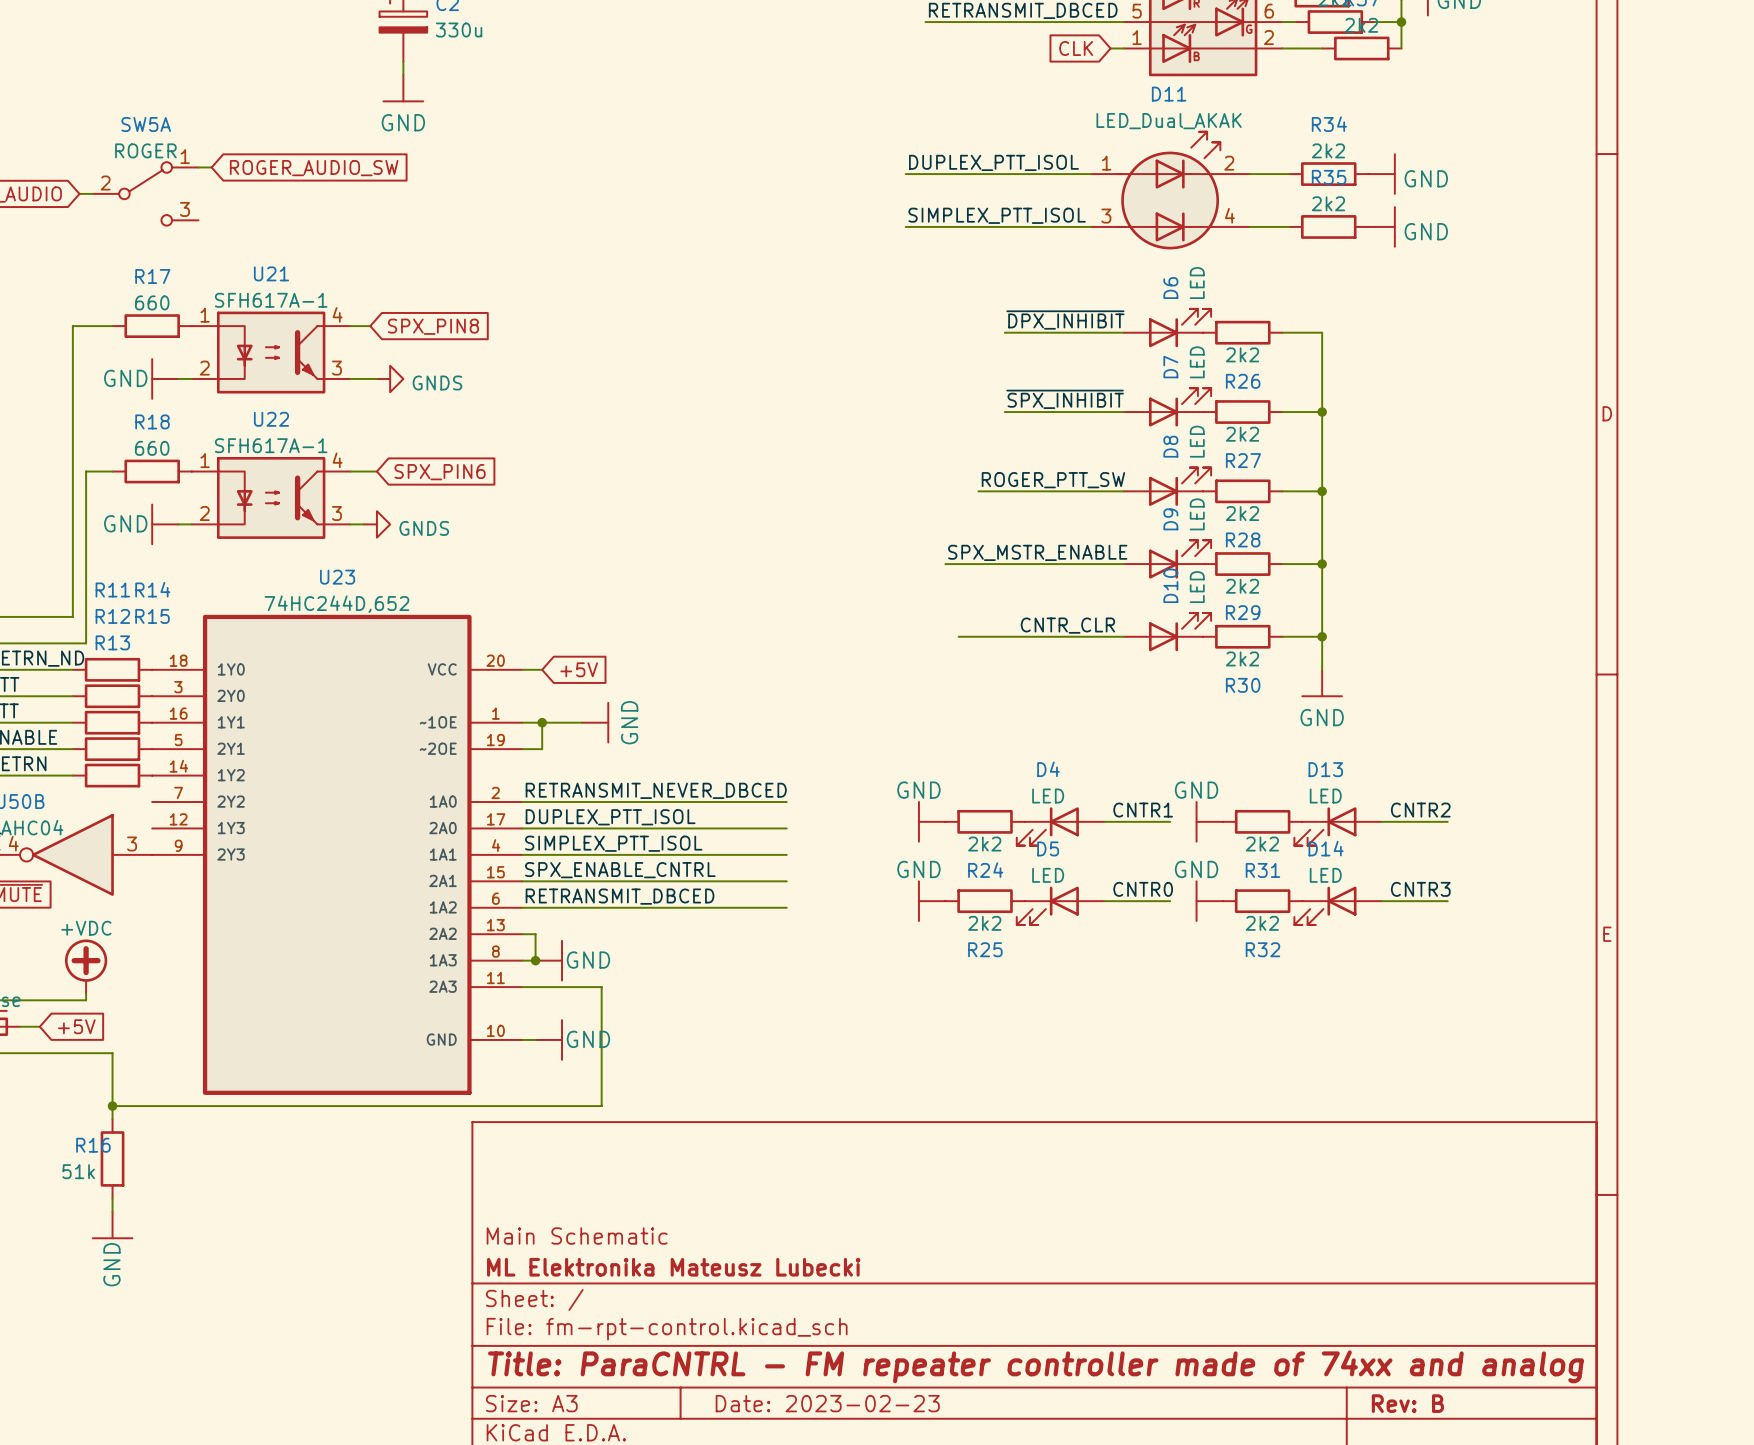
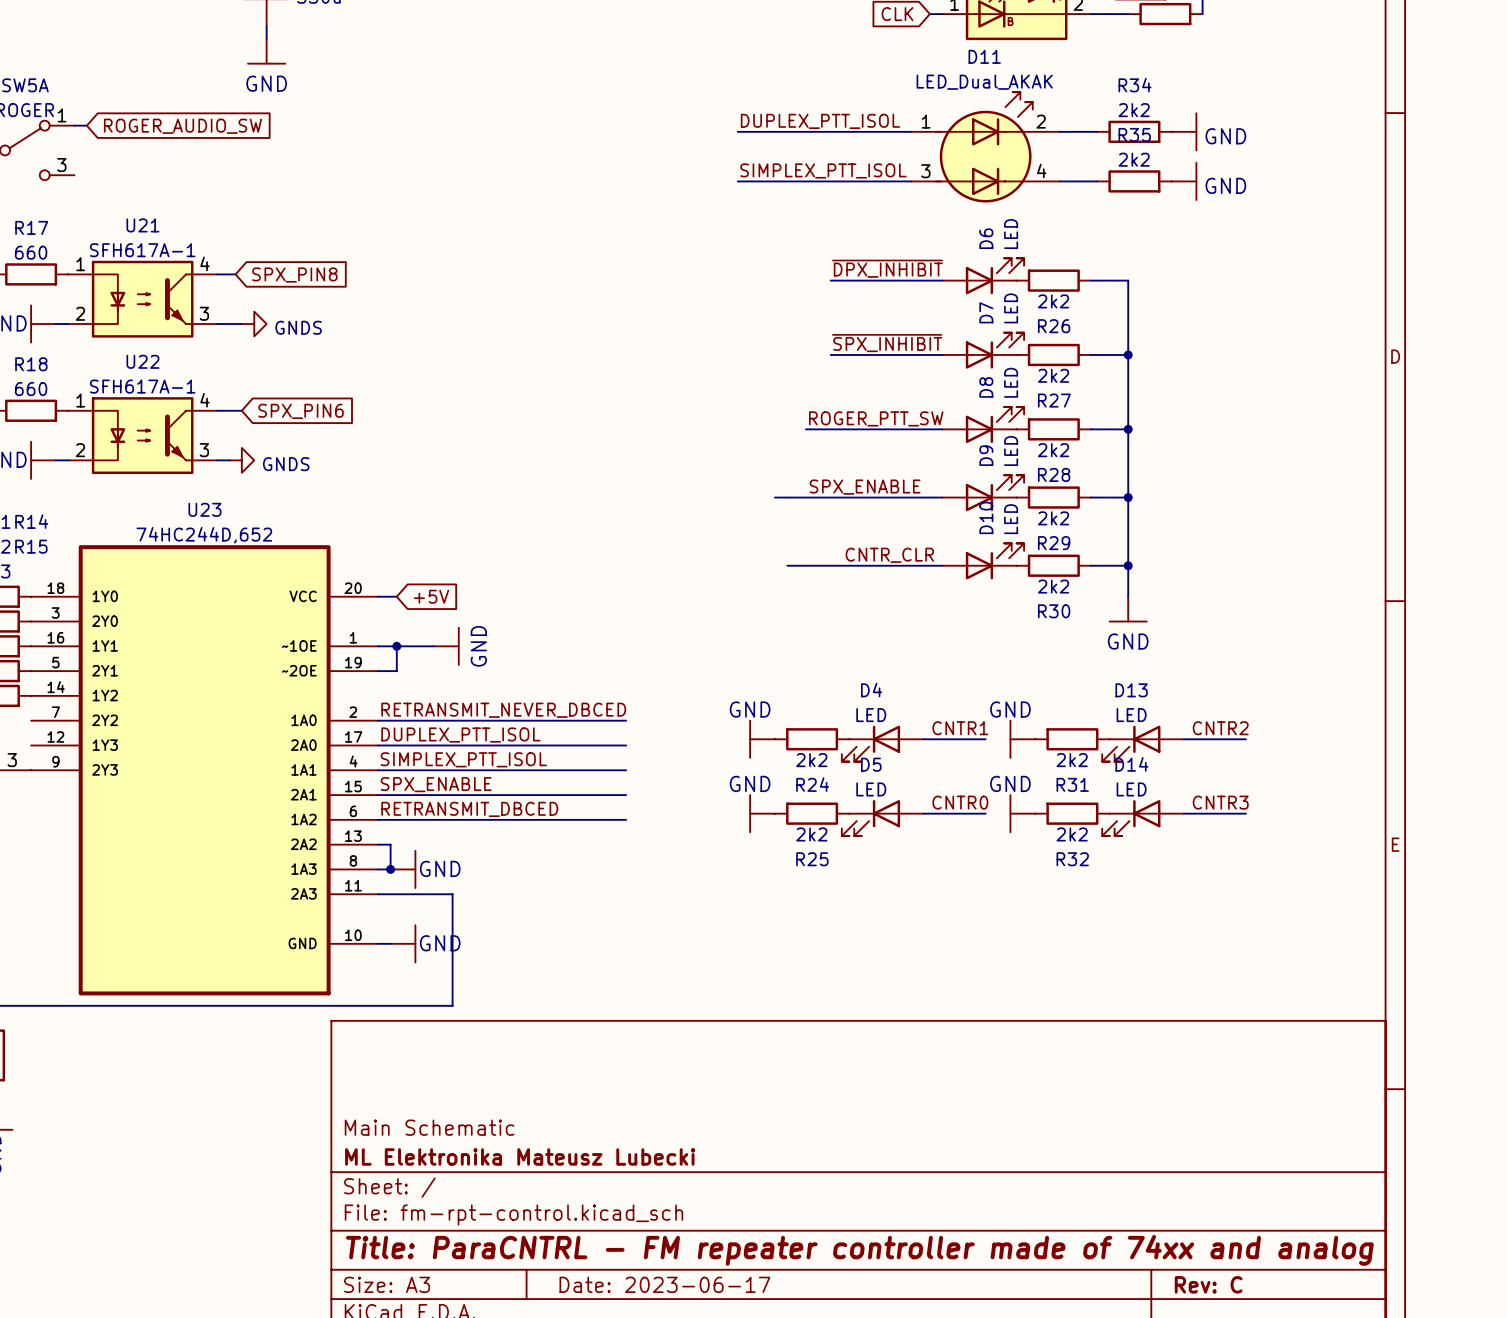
label: SPX_MSTR_ENABLE (1037, 552) -> SPX_ENABLE (865, 487)
label: SPX_ENABLE_CNTRL (620, 870) -> SPX_ENABLE (436, 784)
title block: Date: 2023-02-23 (827, 1403) -> Date: 2023-06-17 (664, 1284)
title block: Rev: B (1407, 1403) -> Rev: C (1208, 1284)

